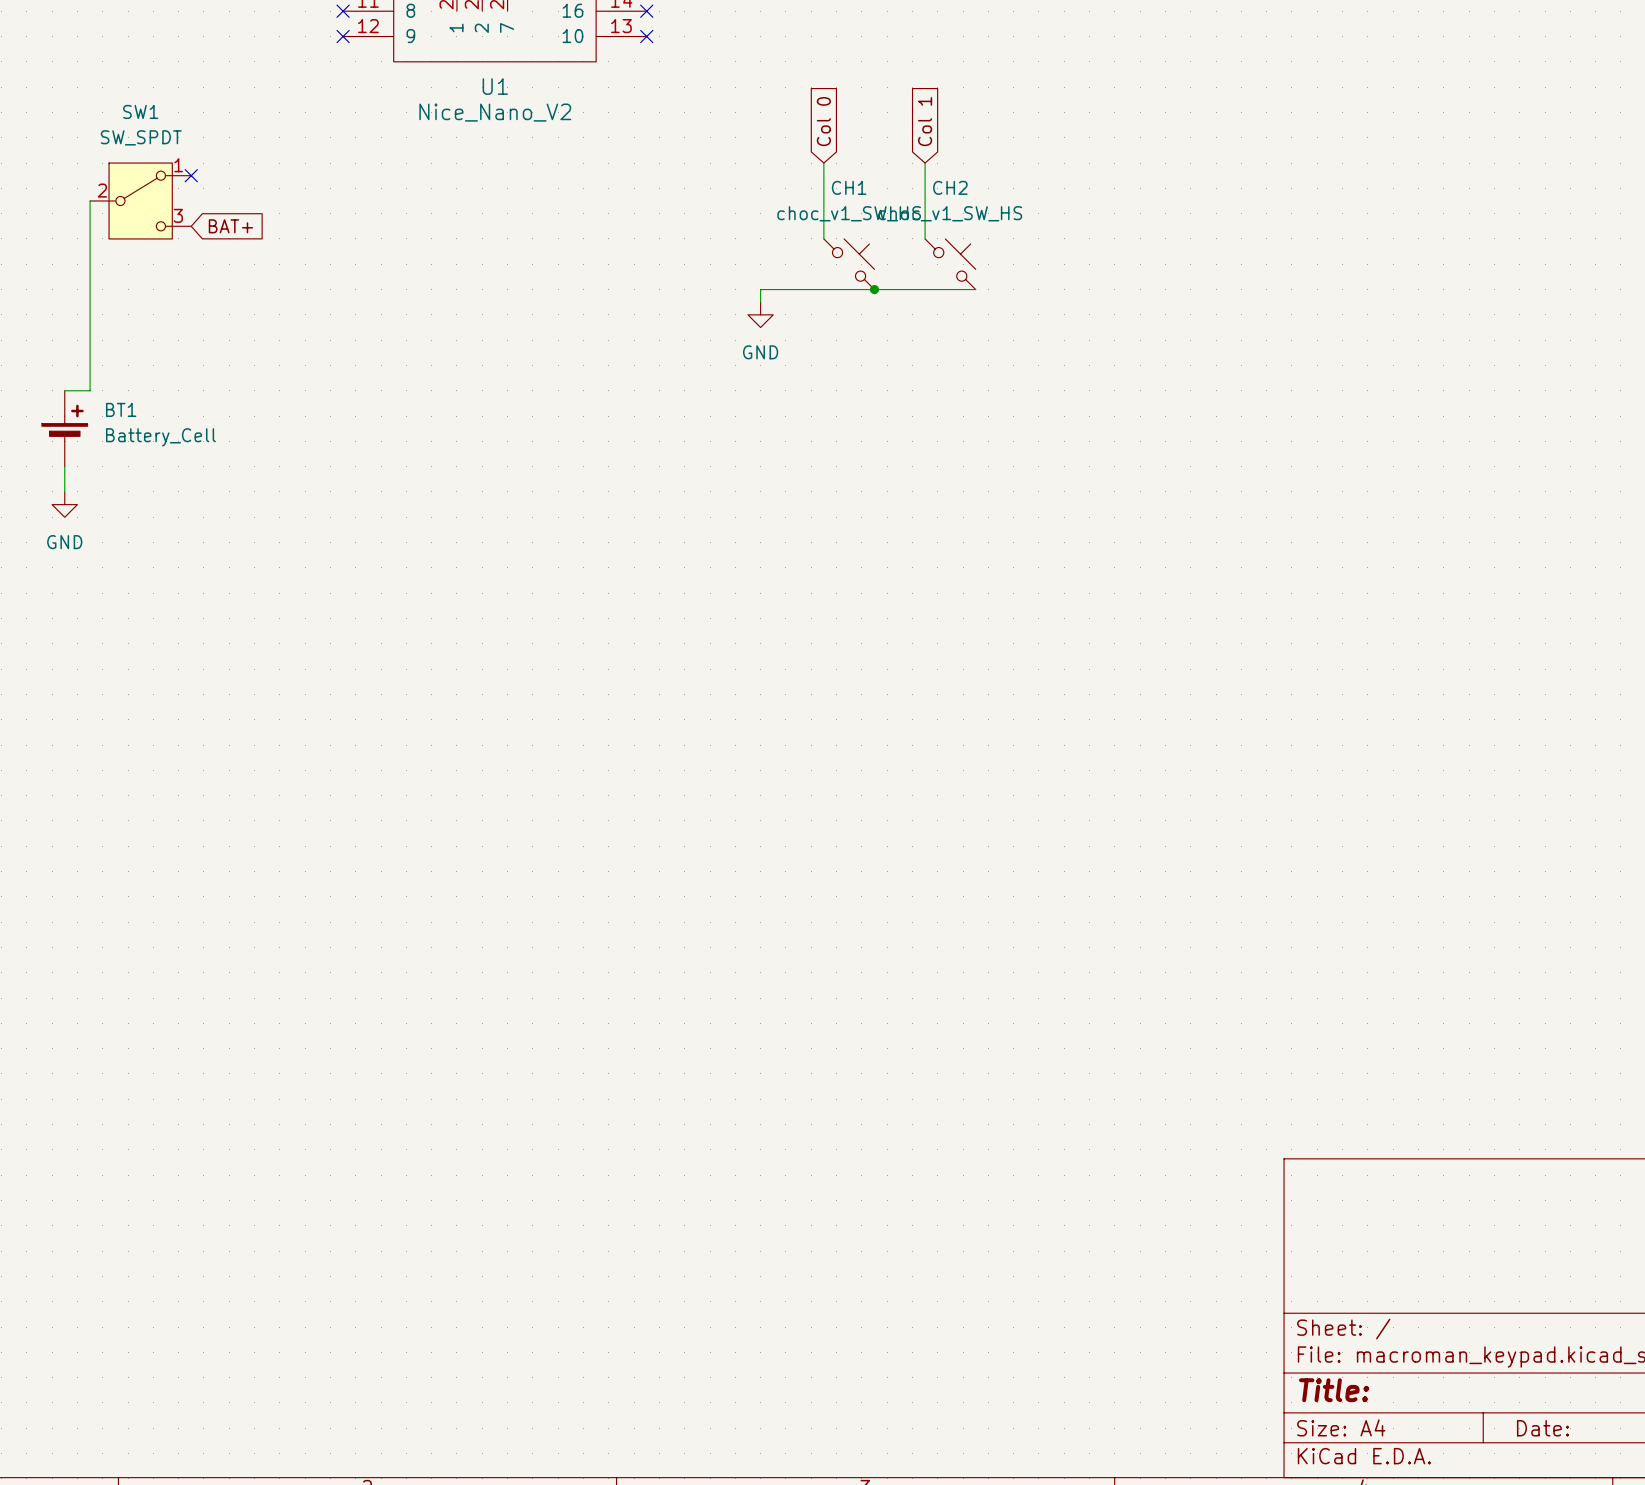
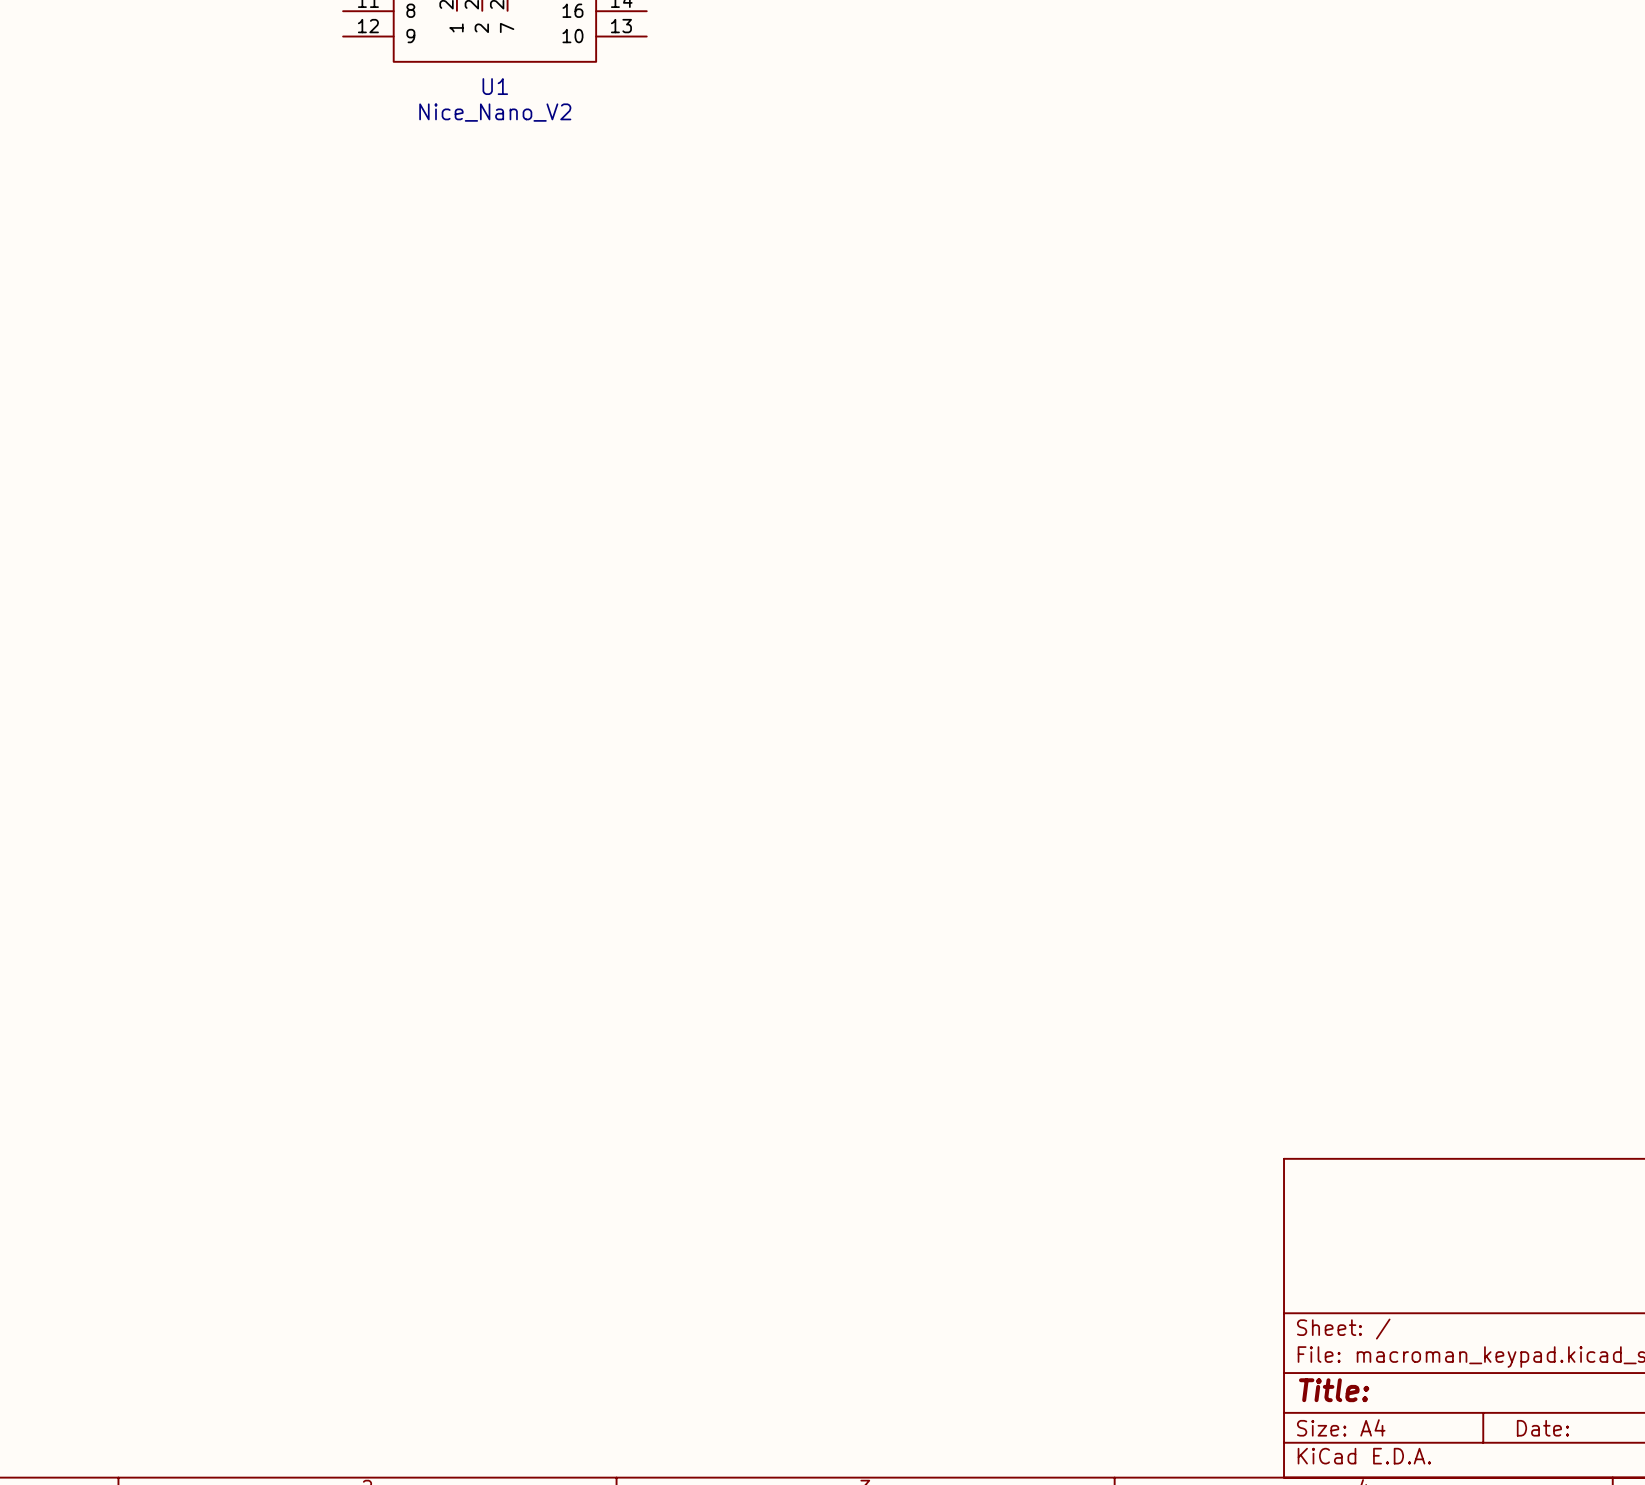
no-connect mark: (343, 11) -> none
no-connect mark: (646, 11) -> none
no-connect mark: (343, 36) -> none
no-connect mark: (646, 36) -> none
global label: Col 0 (823, 121) -> none
global label: Col 1 (925, 121) -> none
wire: (823, 163) (823, 238) -> none
wire: (925, 163) (925, 238) -> none
no-connect mark: (191, 175) -> none
wire: (90, 200) (90, 390) (64, 390) -> none
SW1: SW_SPDT (140, 200) -> none
global label: BAT+ (230, 226) -> none
CH1: choc_v1_SW_HS (849, 264) -> none
CH2: choc_v1_SW_HS (950, 264) -> none
junction: (874, 289) -> none
wire: (975, 289) (760, 289) (760, 302) -> none
power symbol: GND (760, 314) -> none
BT1: Battery_Cell (64, 428) -> none
wire: (64, 466) (64, 491) -> none
power symbol: GND (64, 504) -> none

